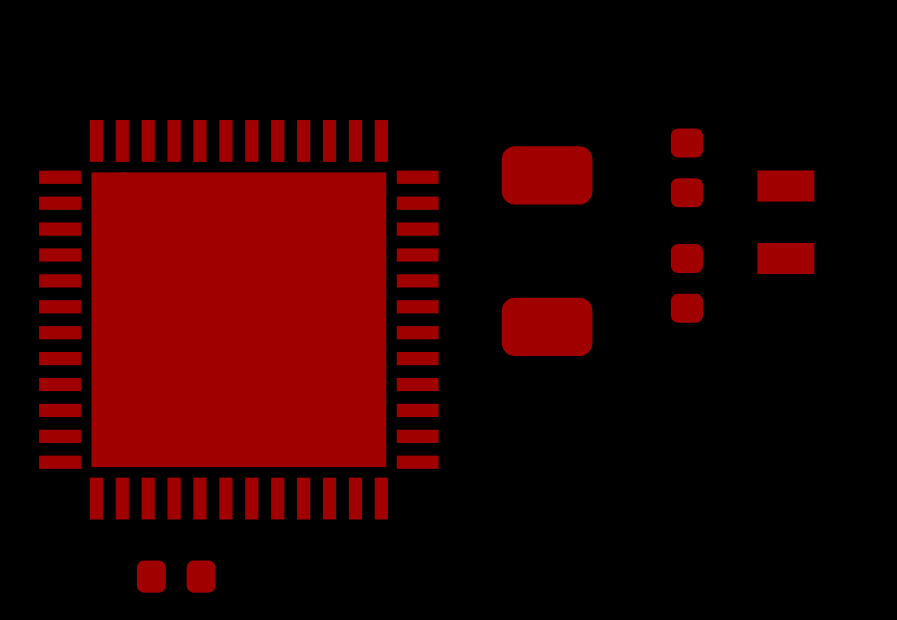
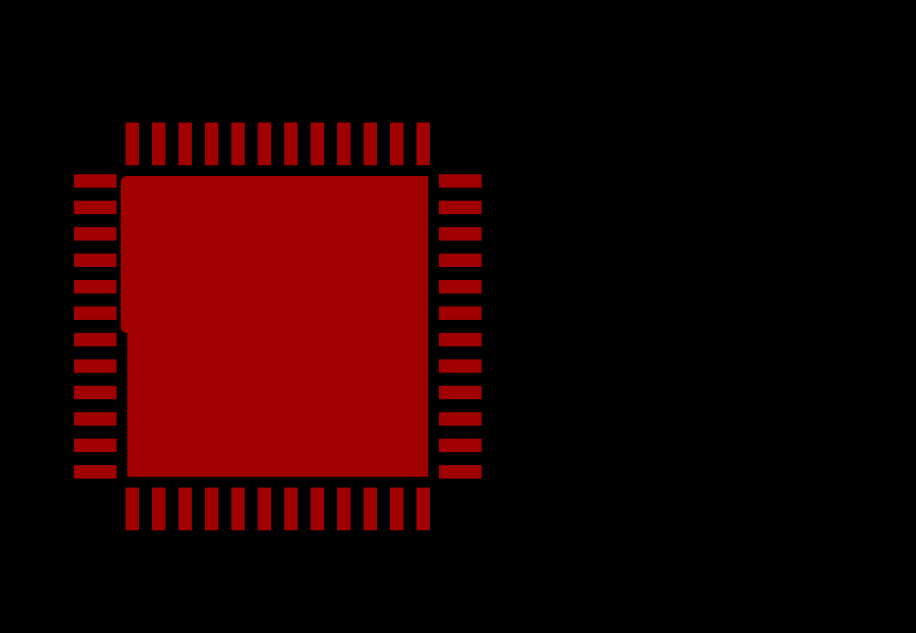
part: (686, 167) -> none
part: (785, 222) -> none
part: (547, 251) -> none
part: (686, 283) -> none
part position: (238, 319) -> (277, 326)
part: (176, 576) -> none

